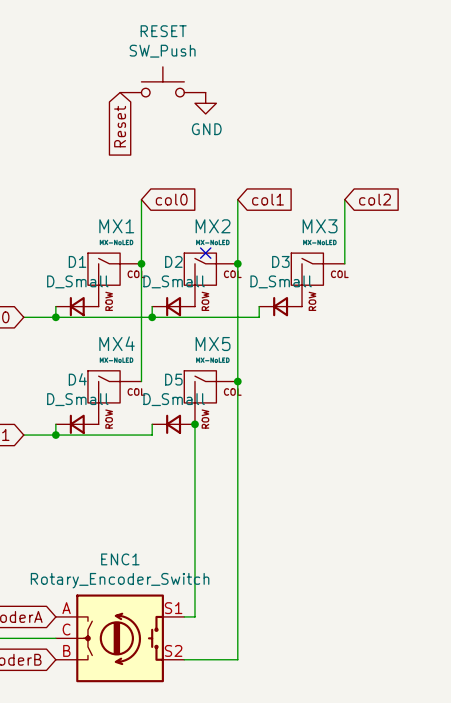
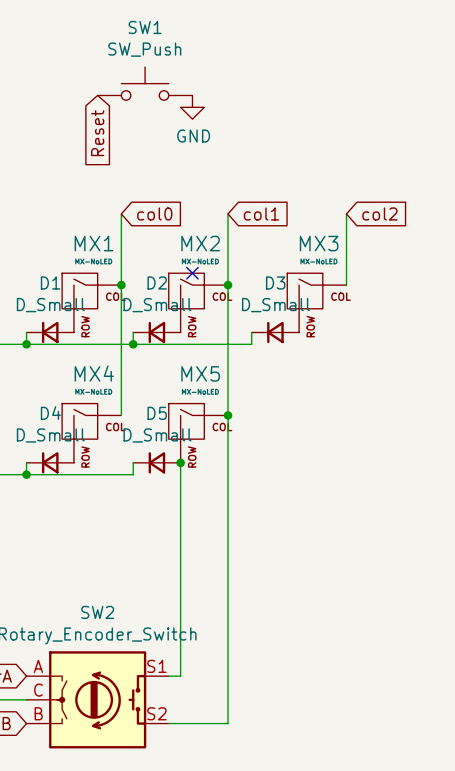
RESET name: RESET (163, 31) -> SW1 (145, 27)
ENC1 name: ENC1 (120, 559) -> SW2 (97, 612)

